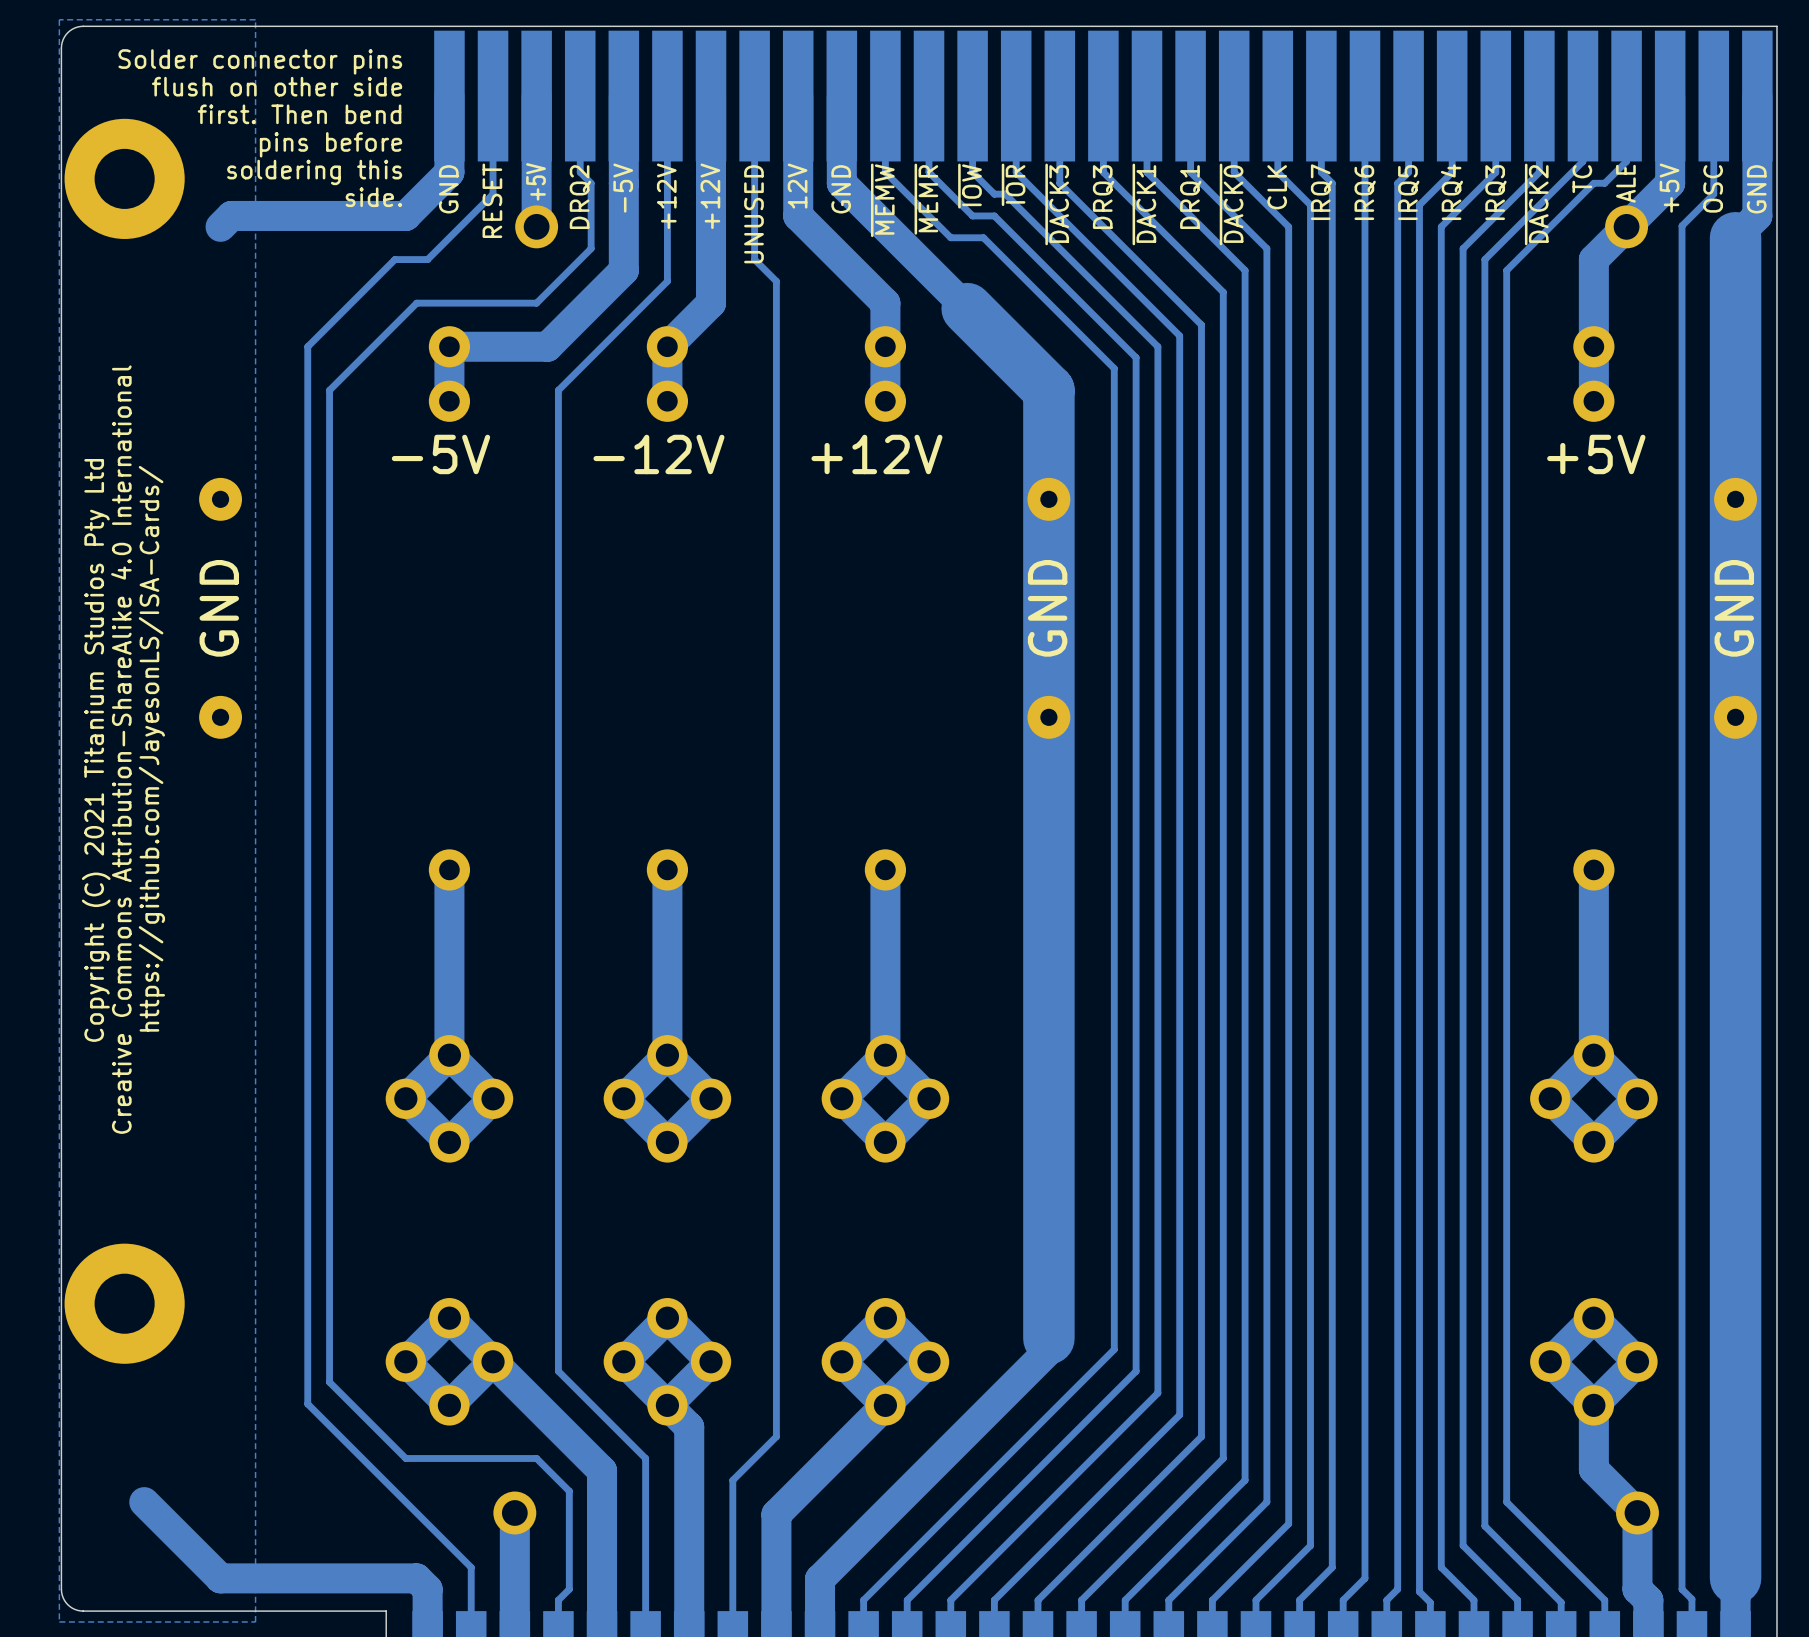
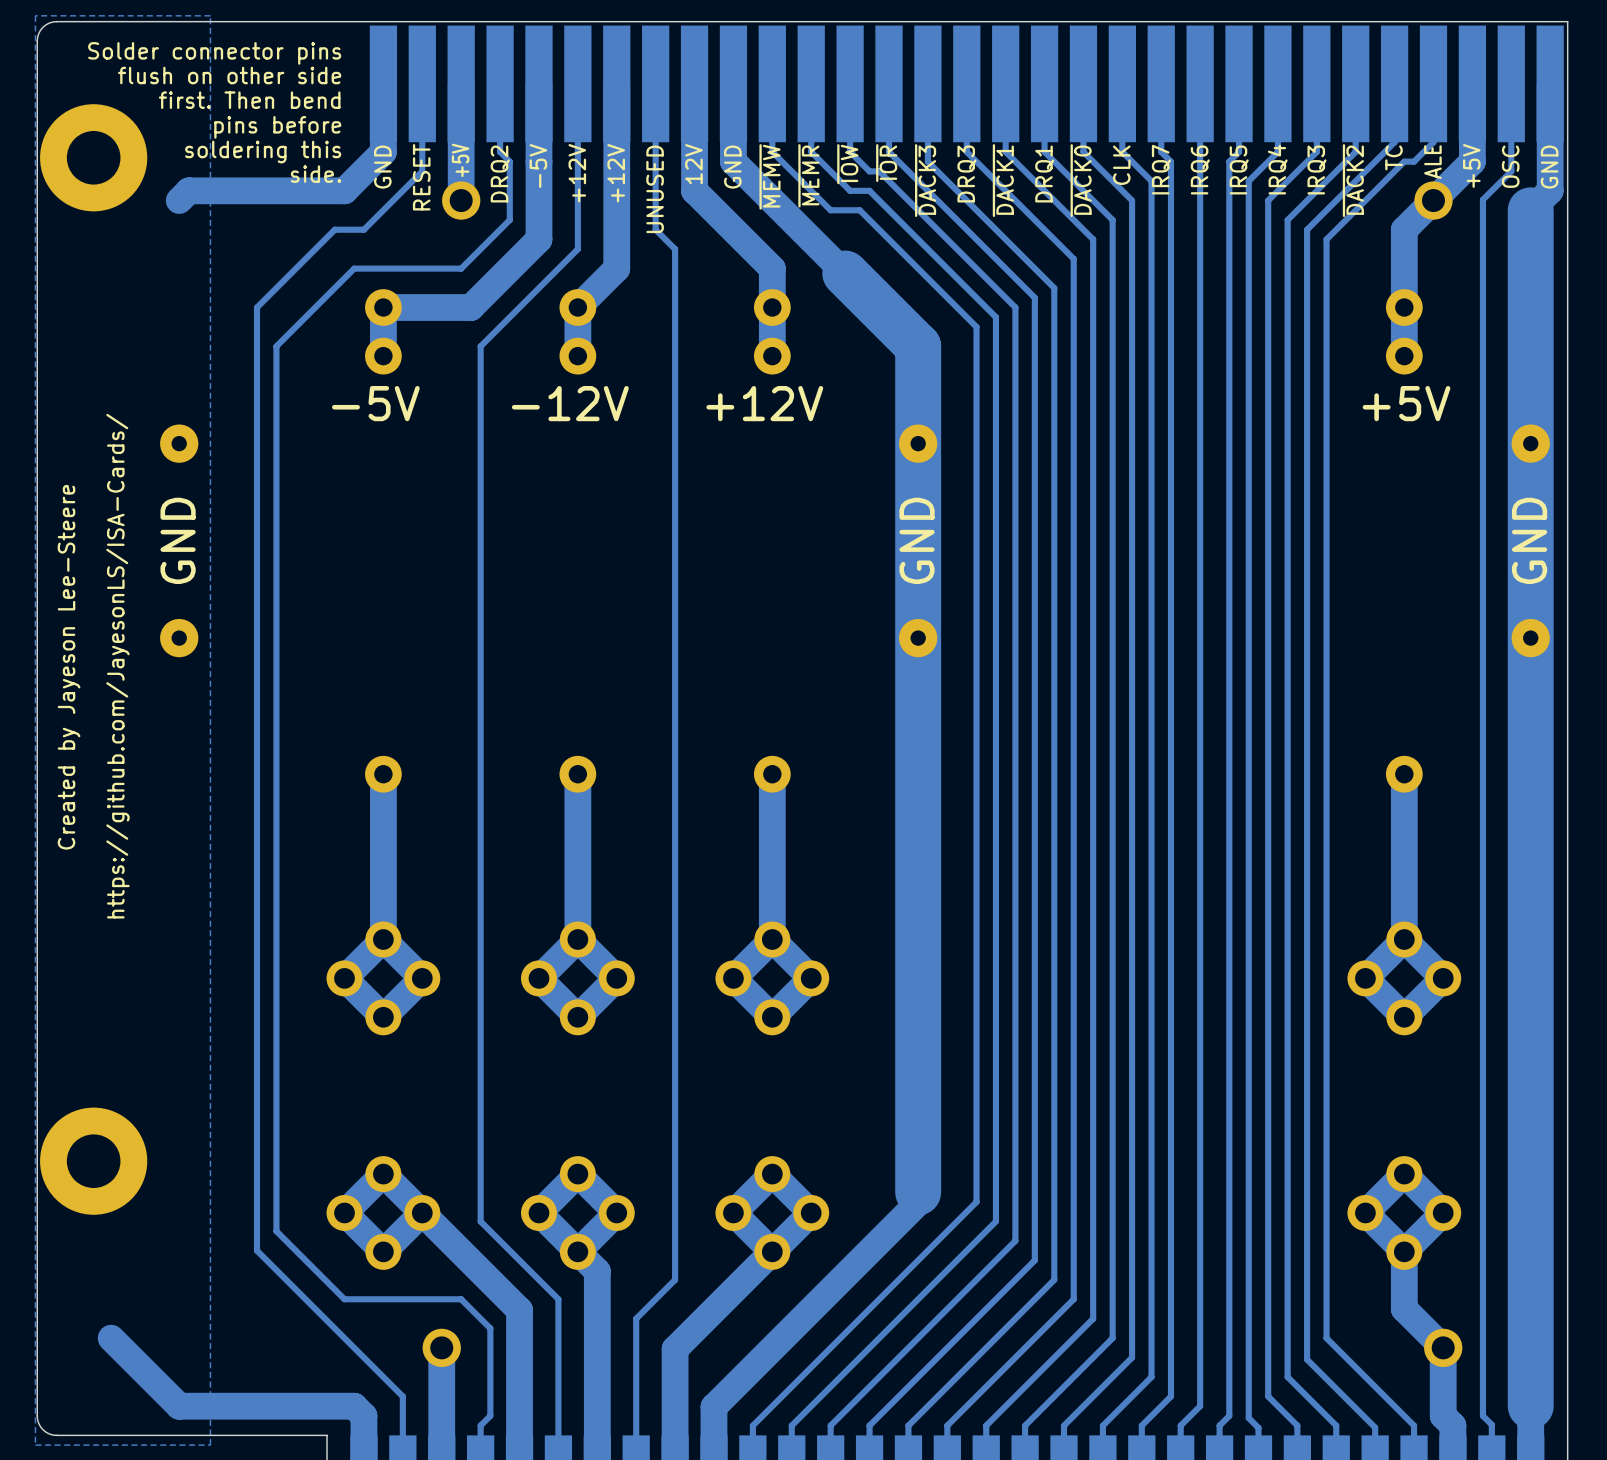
text: Creative Commons Attribution-ShareAlike 4.0 International (121, 749) -> none
text: Copyright (C) 2021 Titanium Studios Pty Ltd (96, 750) -> Created by Jayeson Lee-Steere (69, 667)

